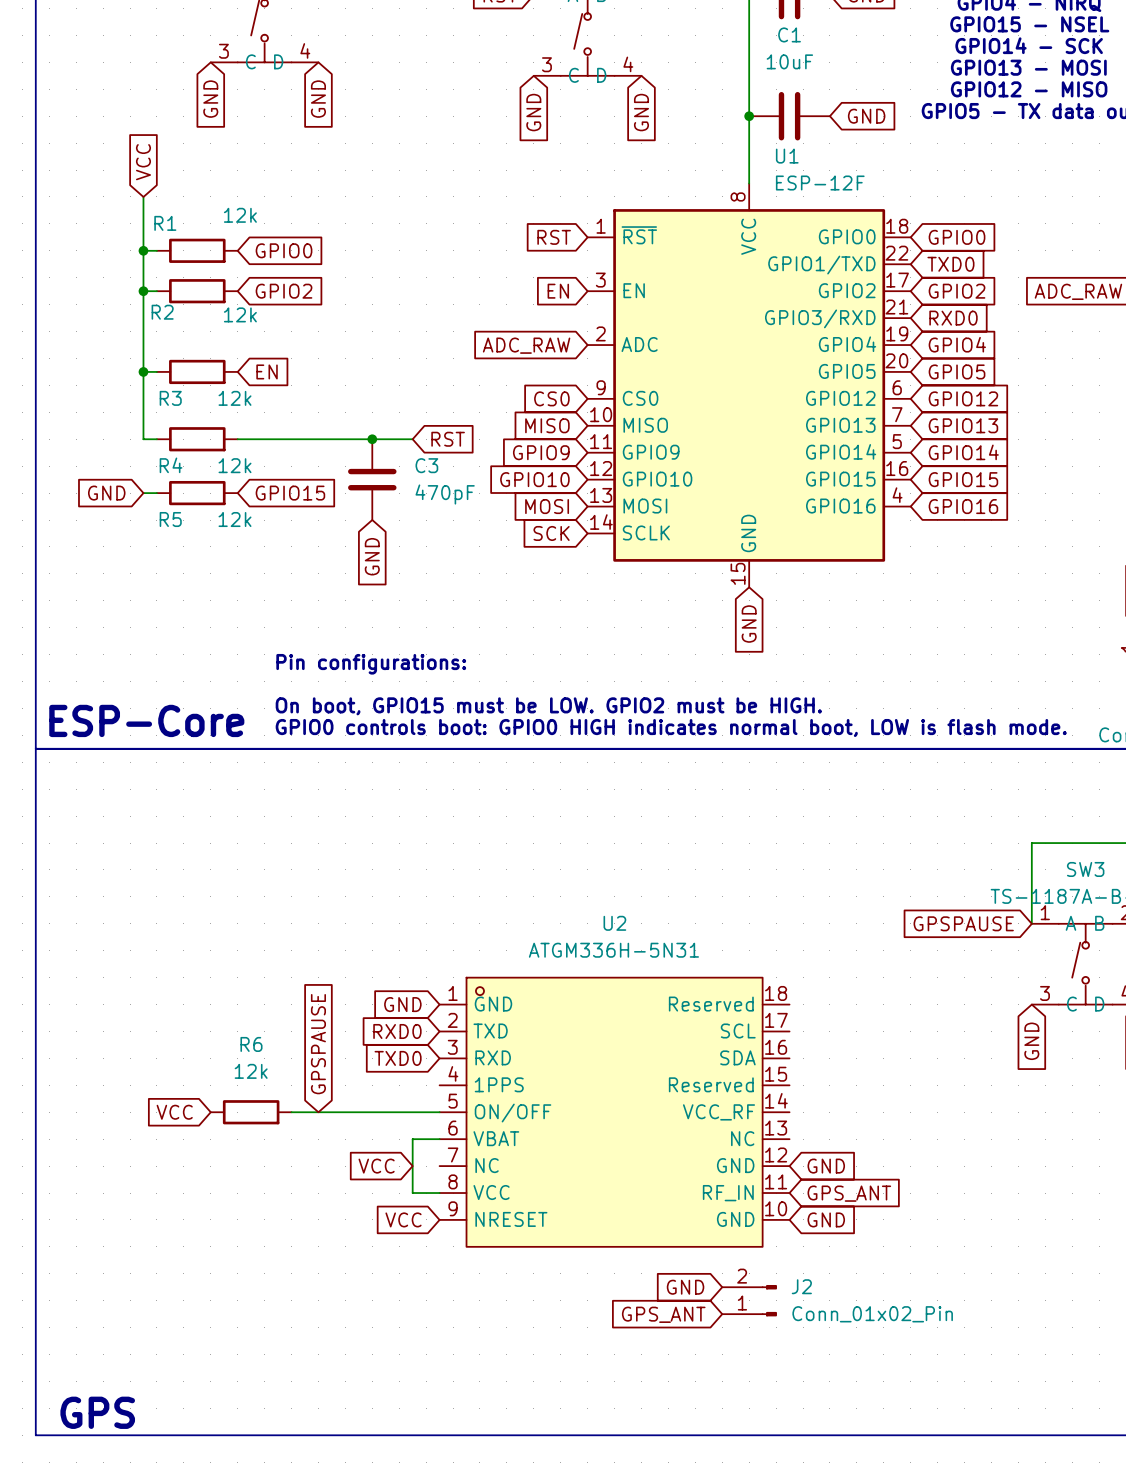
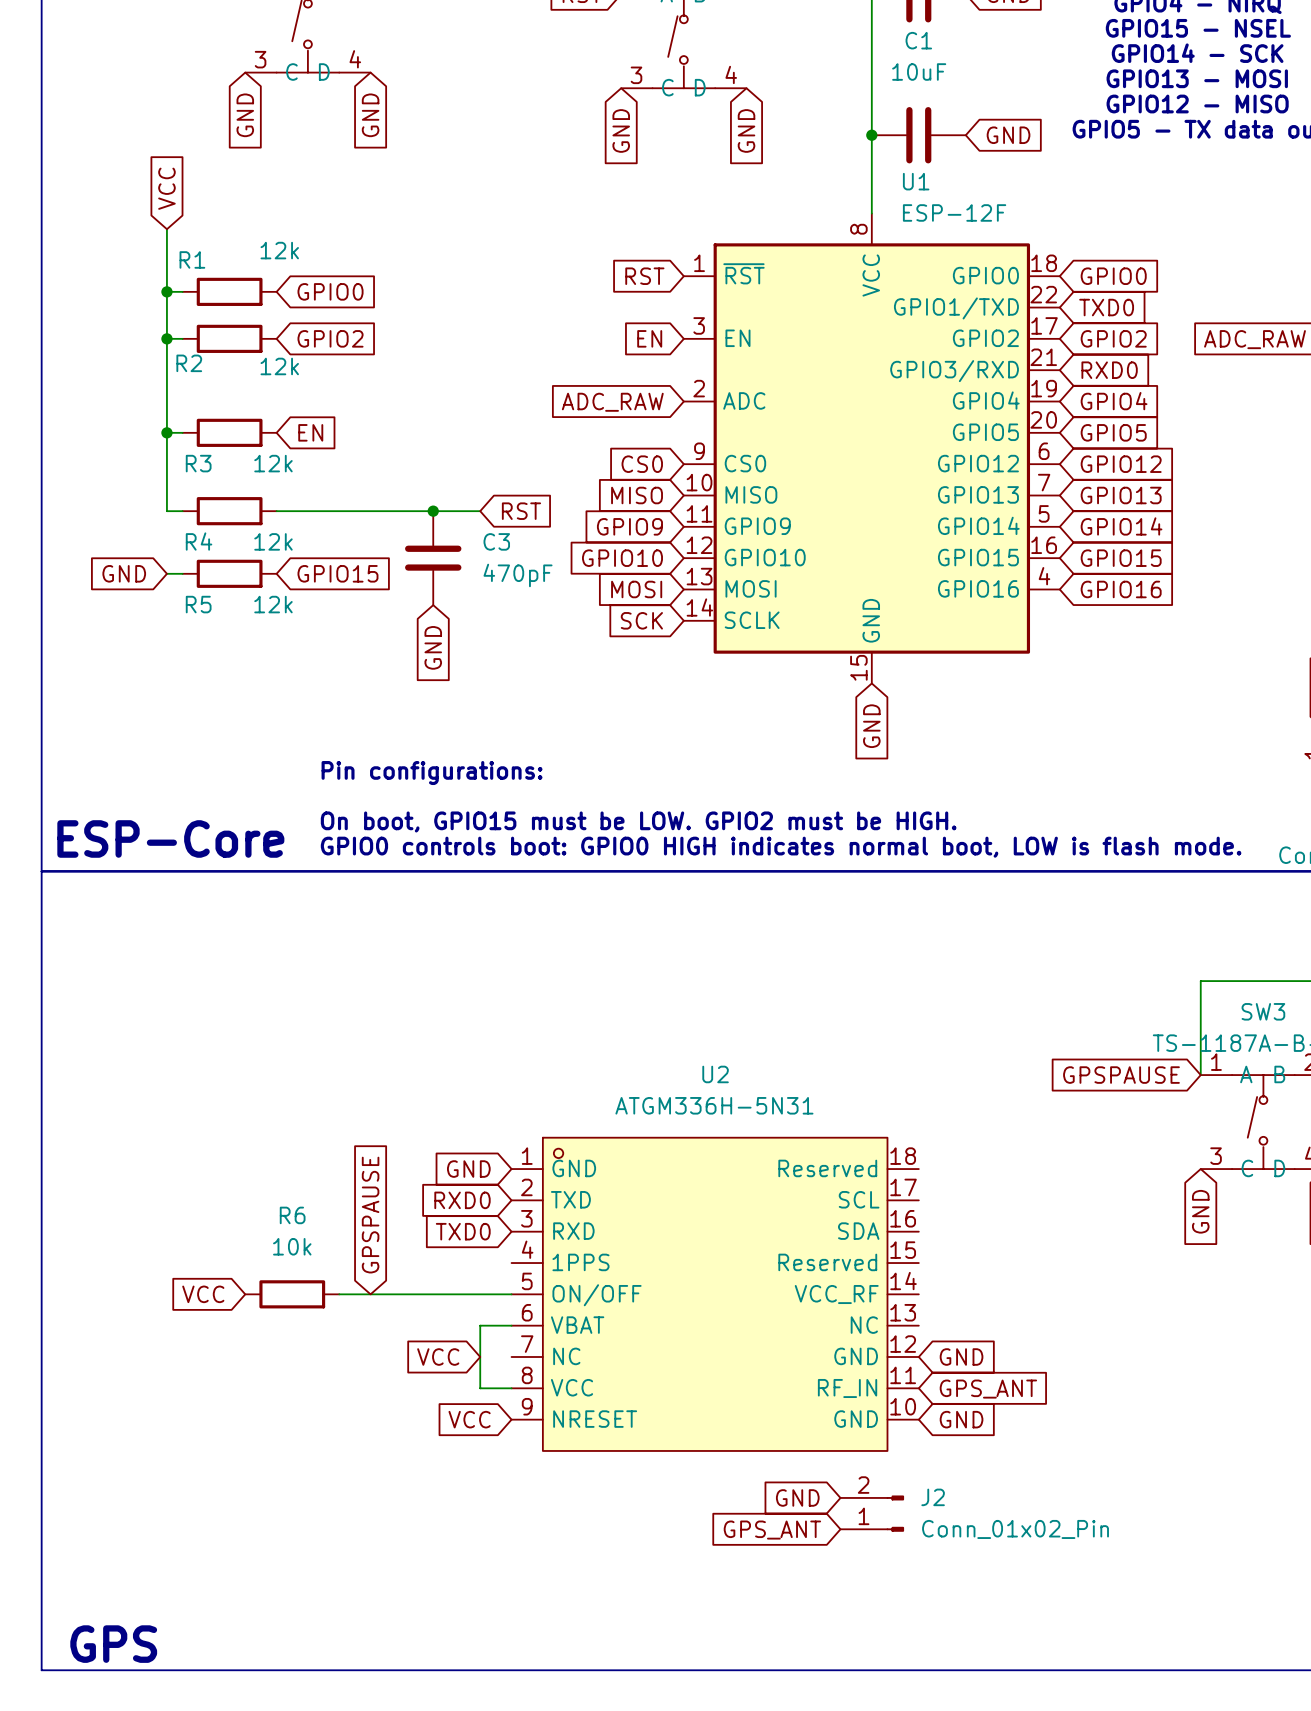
R6 value: 12k (251, 1071) -> 10k (292, 1246)

